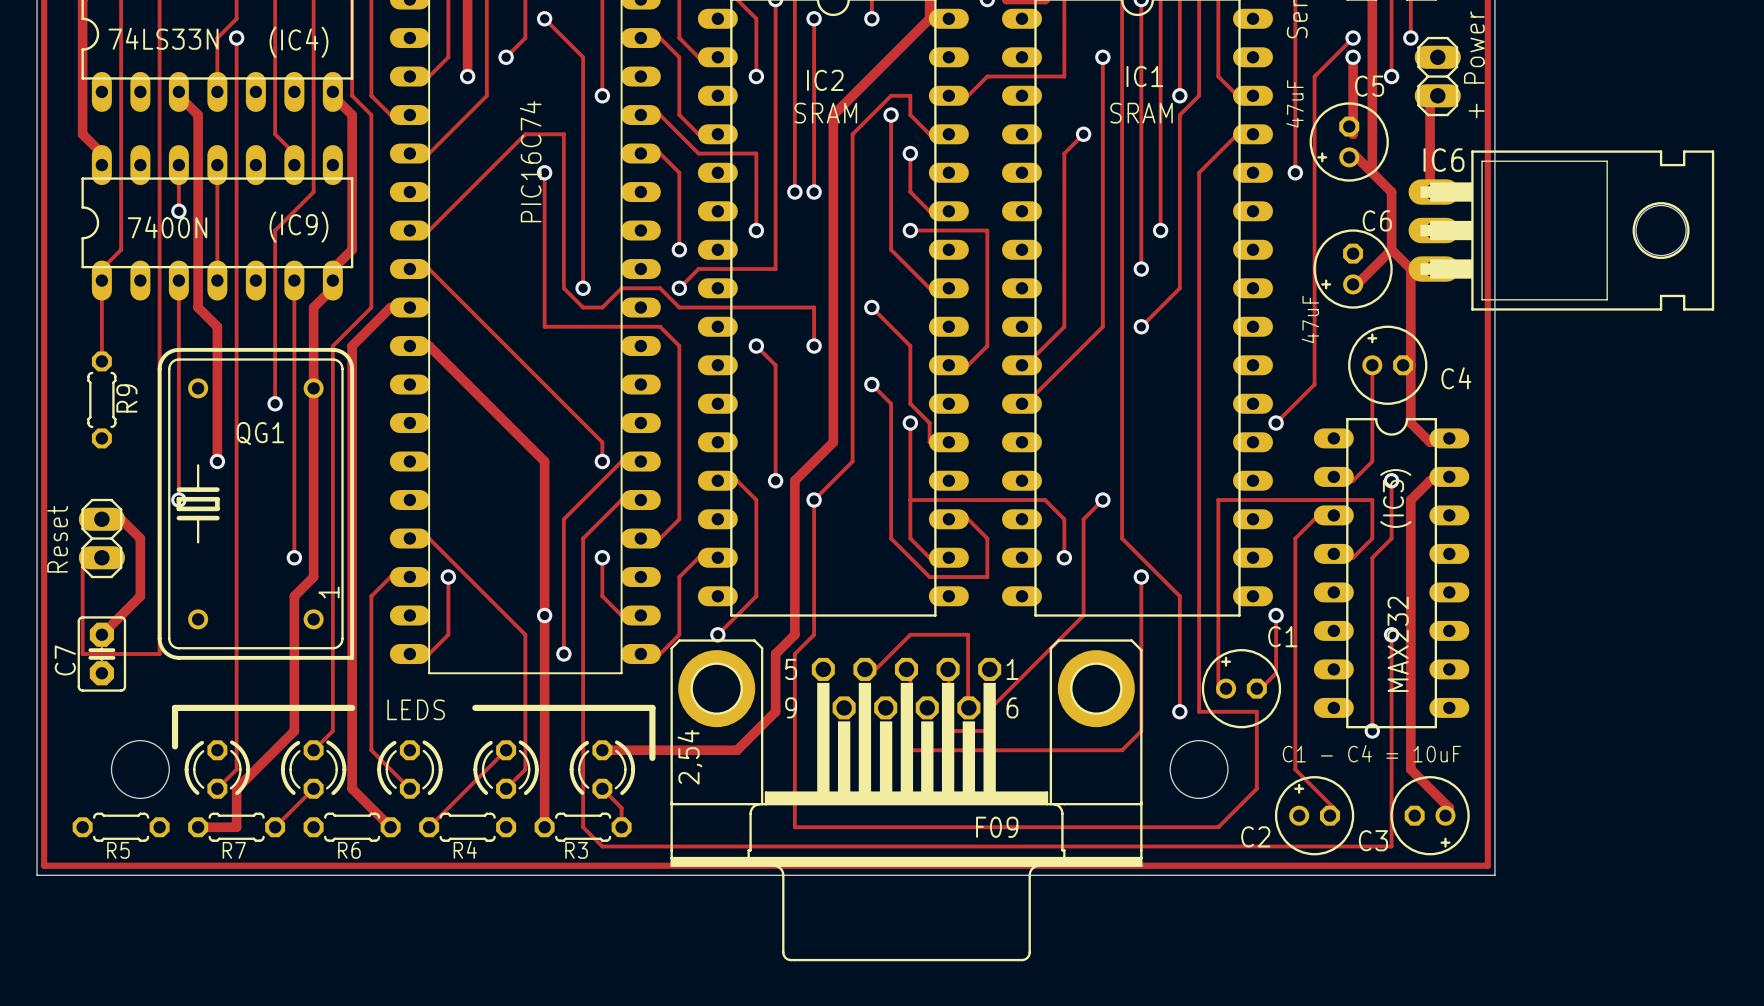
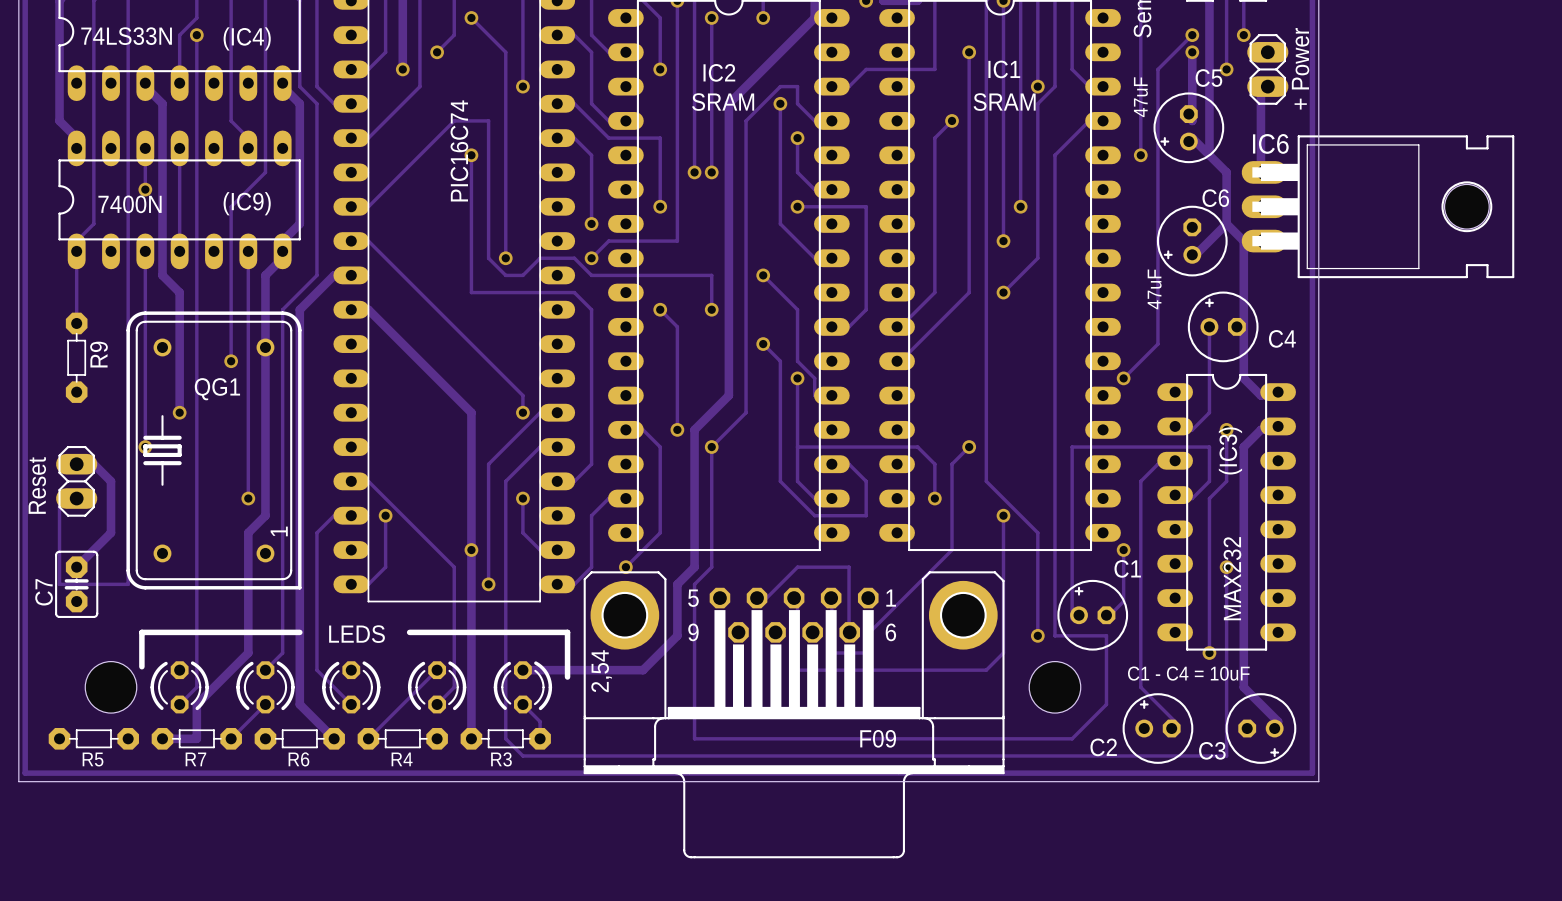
R9 footprint: [87, 351, 117, 449] -> [65, 312, 88, 403]
R5 footprint: [72, 812, 170, 842] -> [48, 728, 139, 750]
R7 footprint: [188, 812, 286, 842] -> [151, 728, 242, 750]
R6 footprint: [303, 812, 401, 842] -> [254, 728, 345, 750]
R4 footprint: [419, 812, 517, 842] -> [357, 728, 448, 750]
R3 footprint: [534, 812, 632, 842] -> [460, 728, 551, 750]

